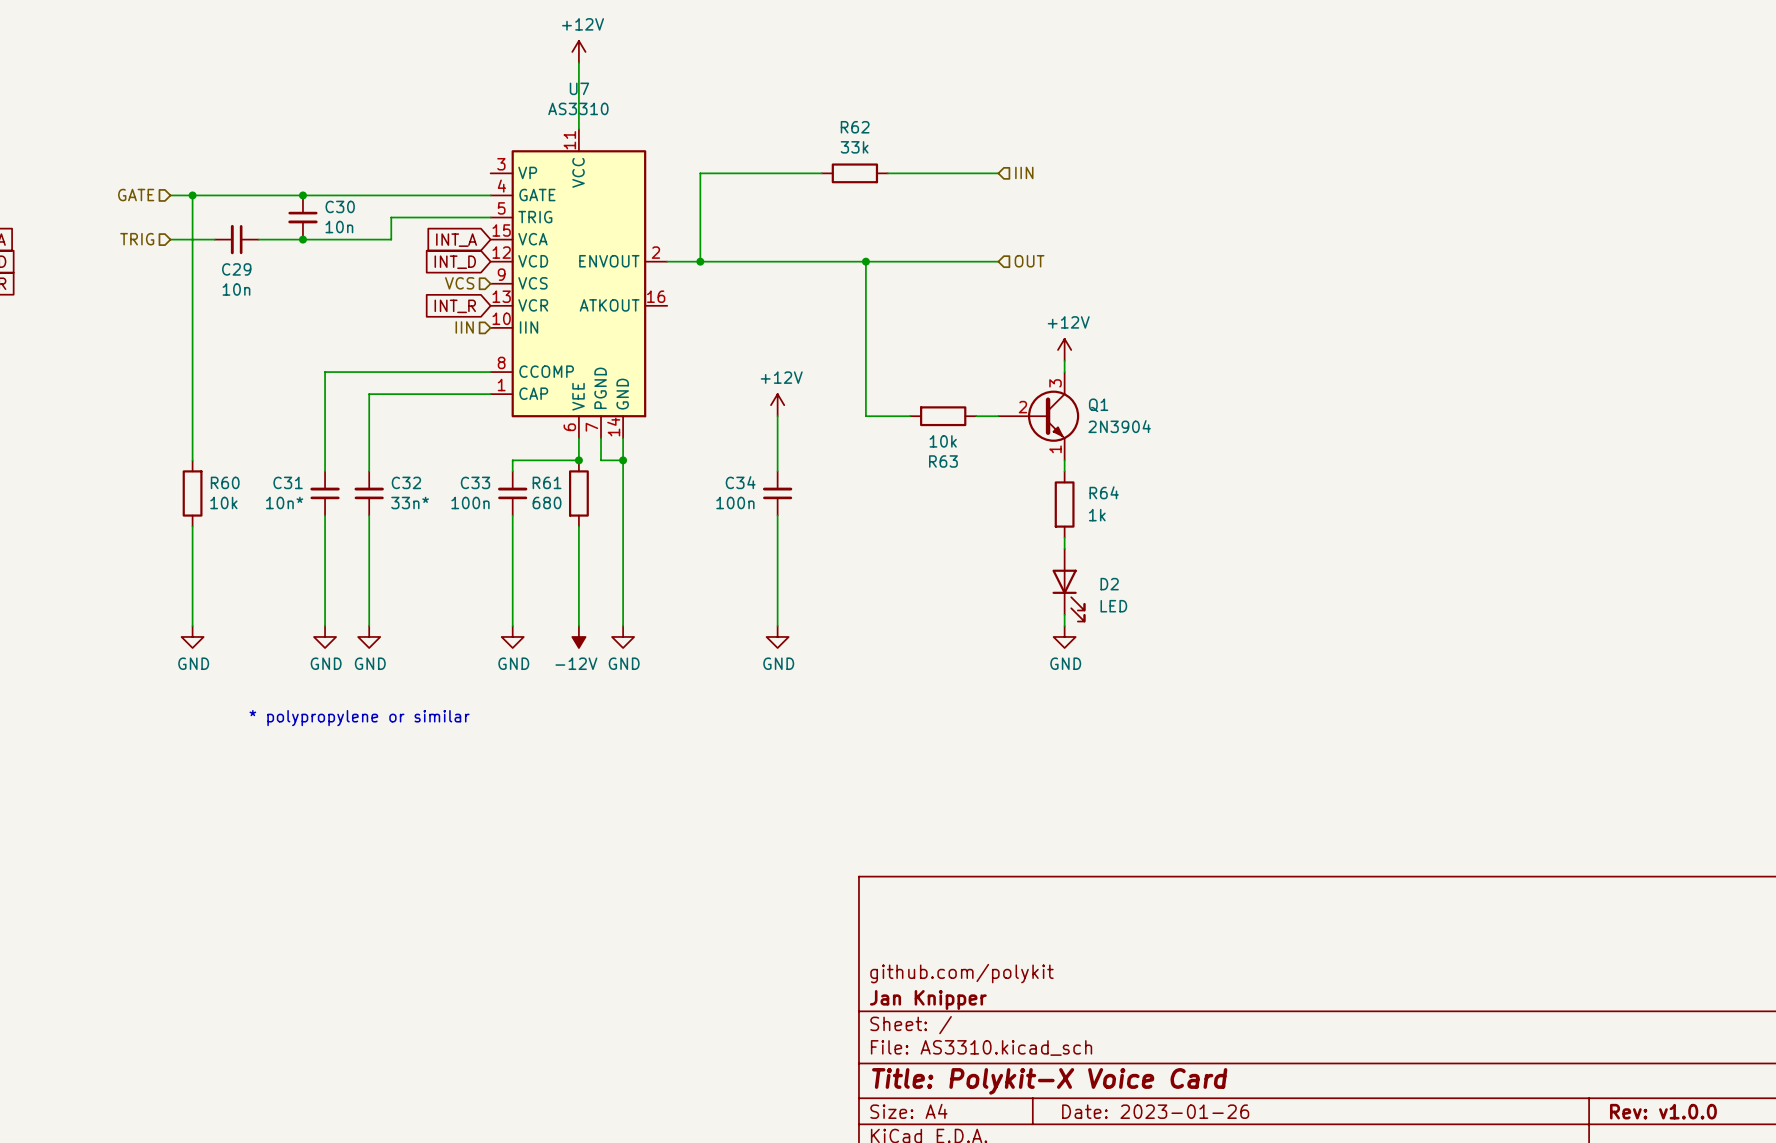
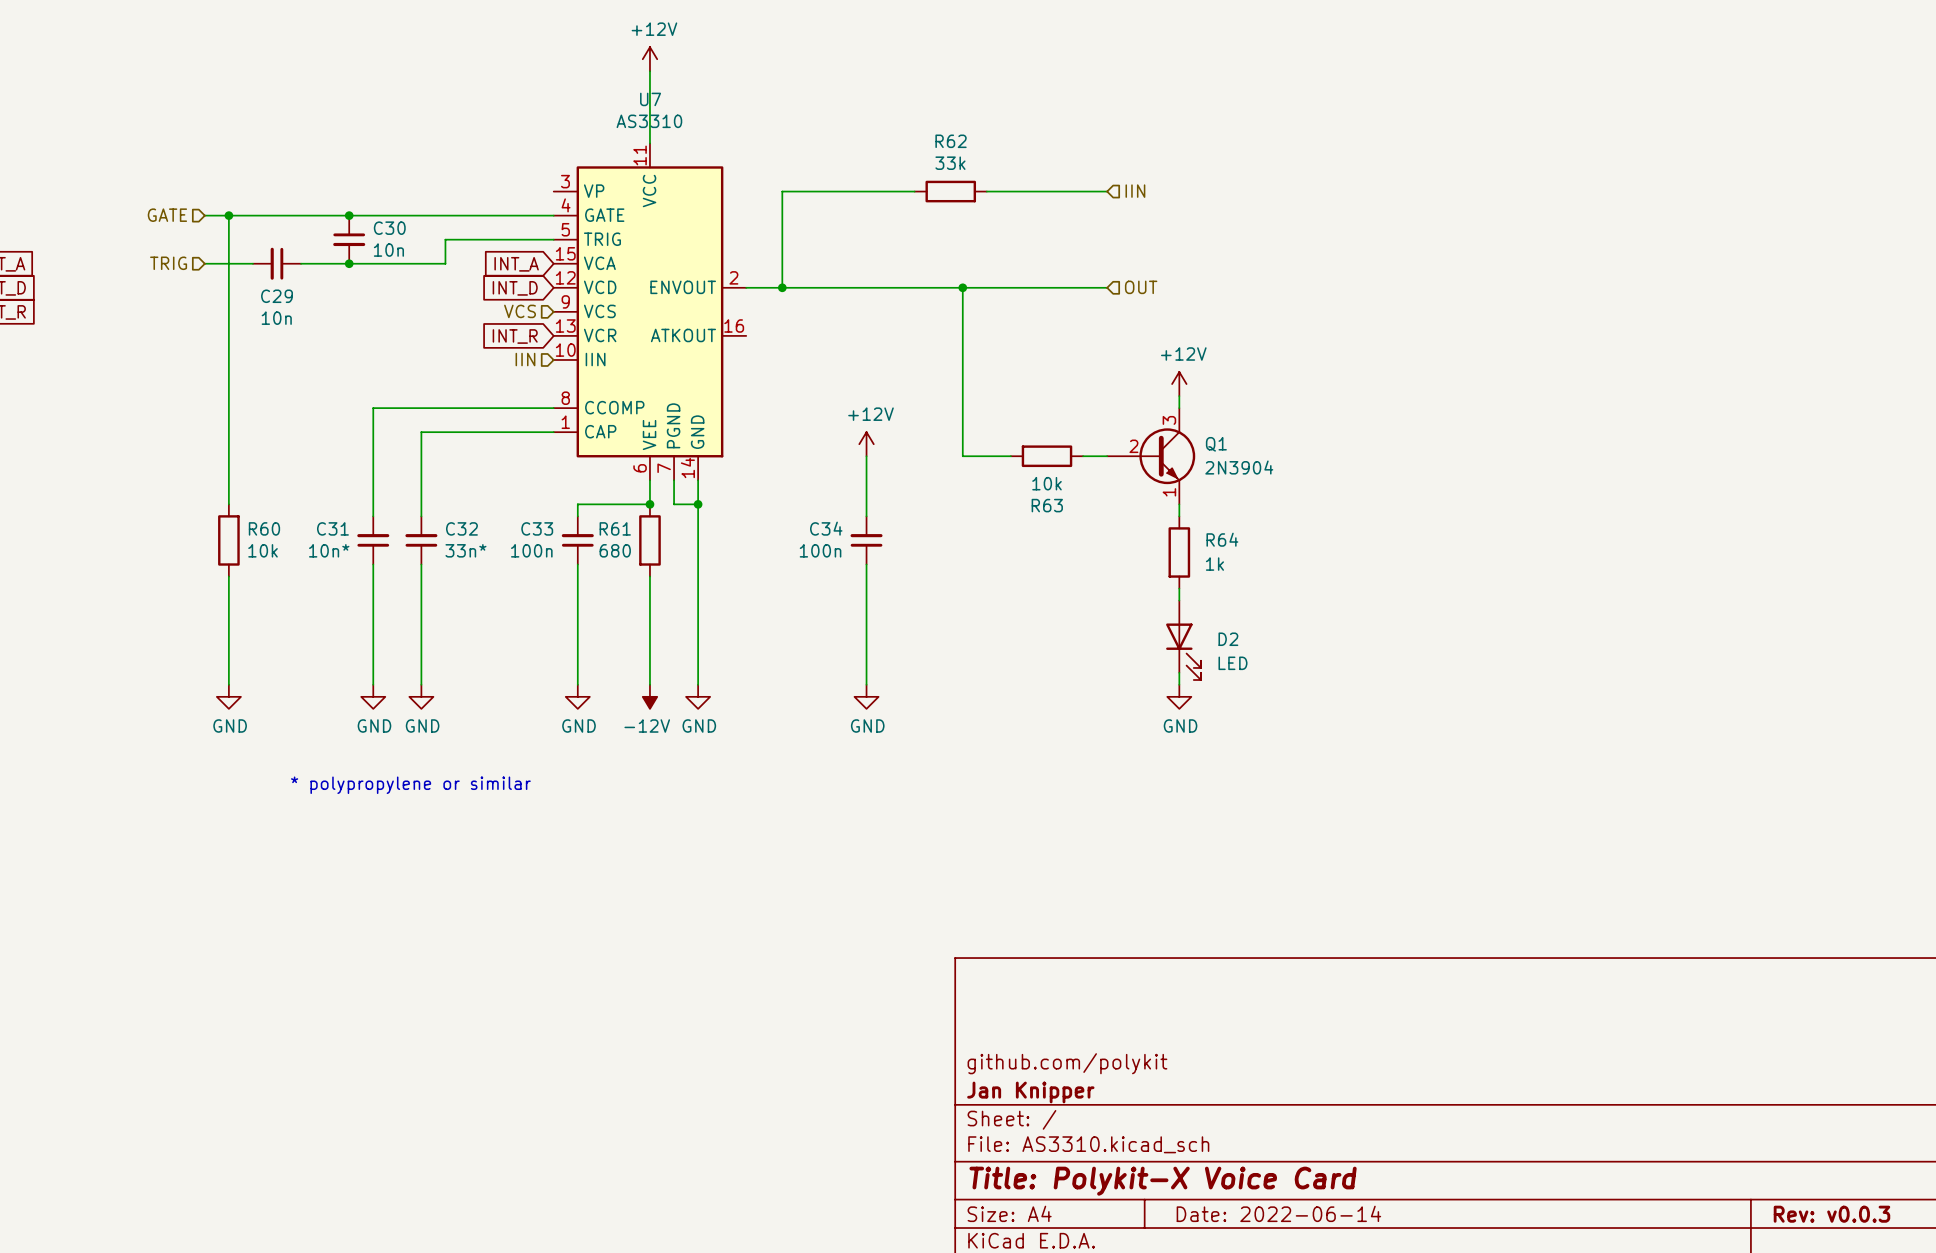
title block: Date: 2023-01-26 (1155, 1111) -> Date: 2022-06-14 (1278, 1213)
title block: Rev: v1.0.0 (1663, 1111) -> Rev: v0.0.3 (1831, 1214)

